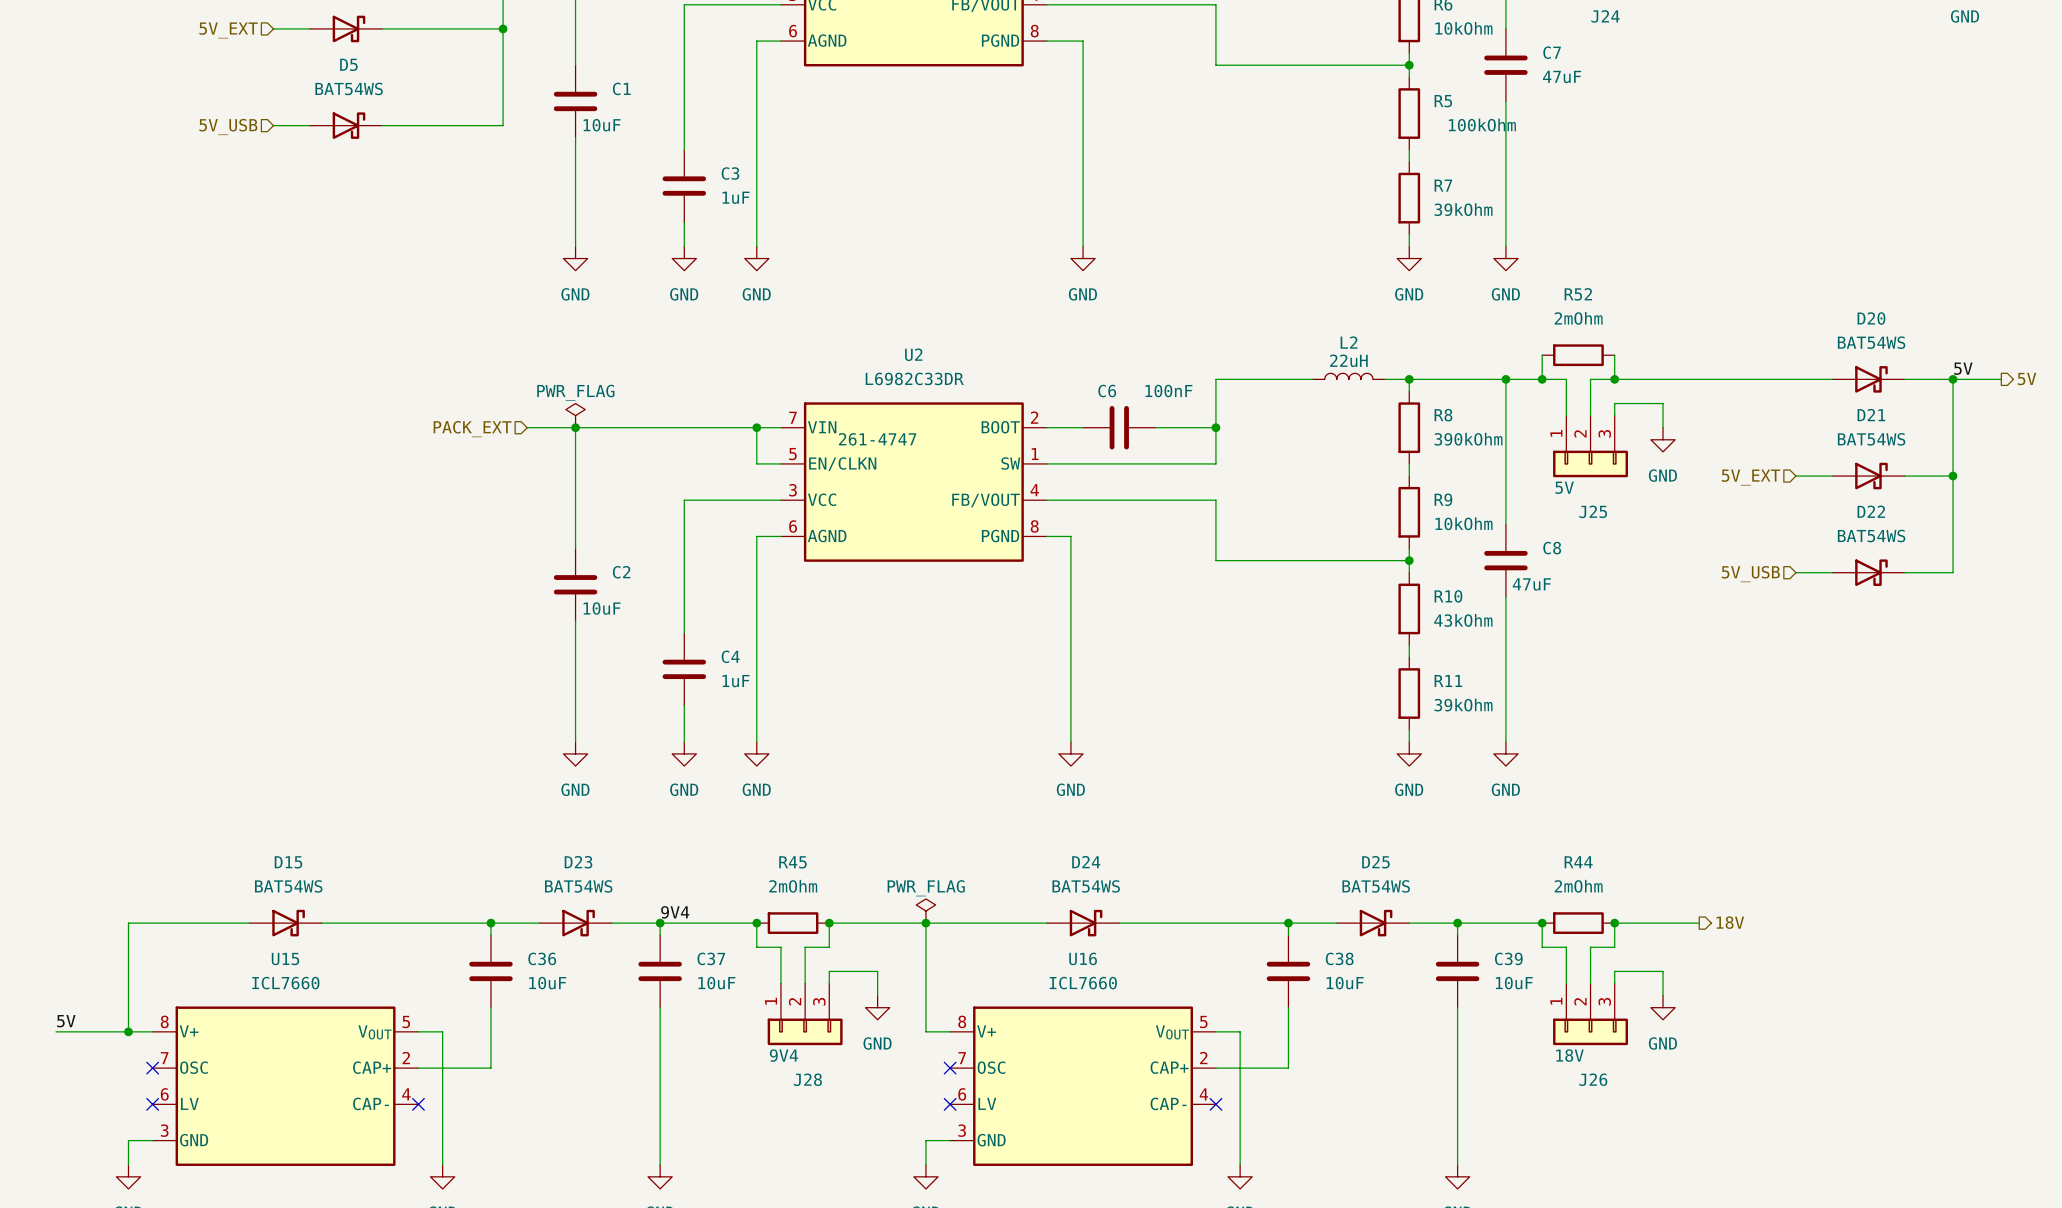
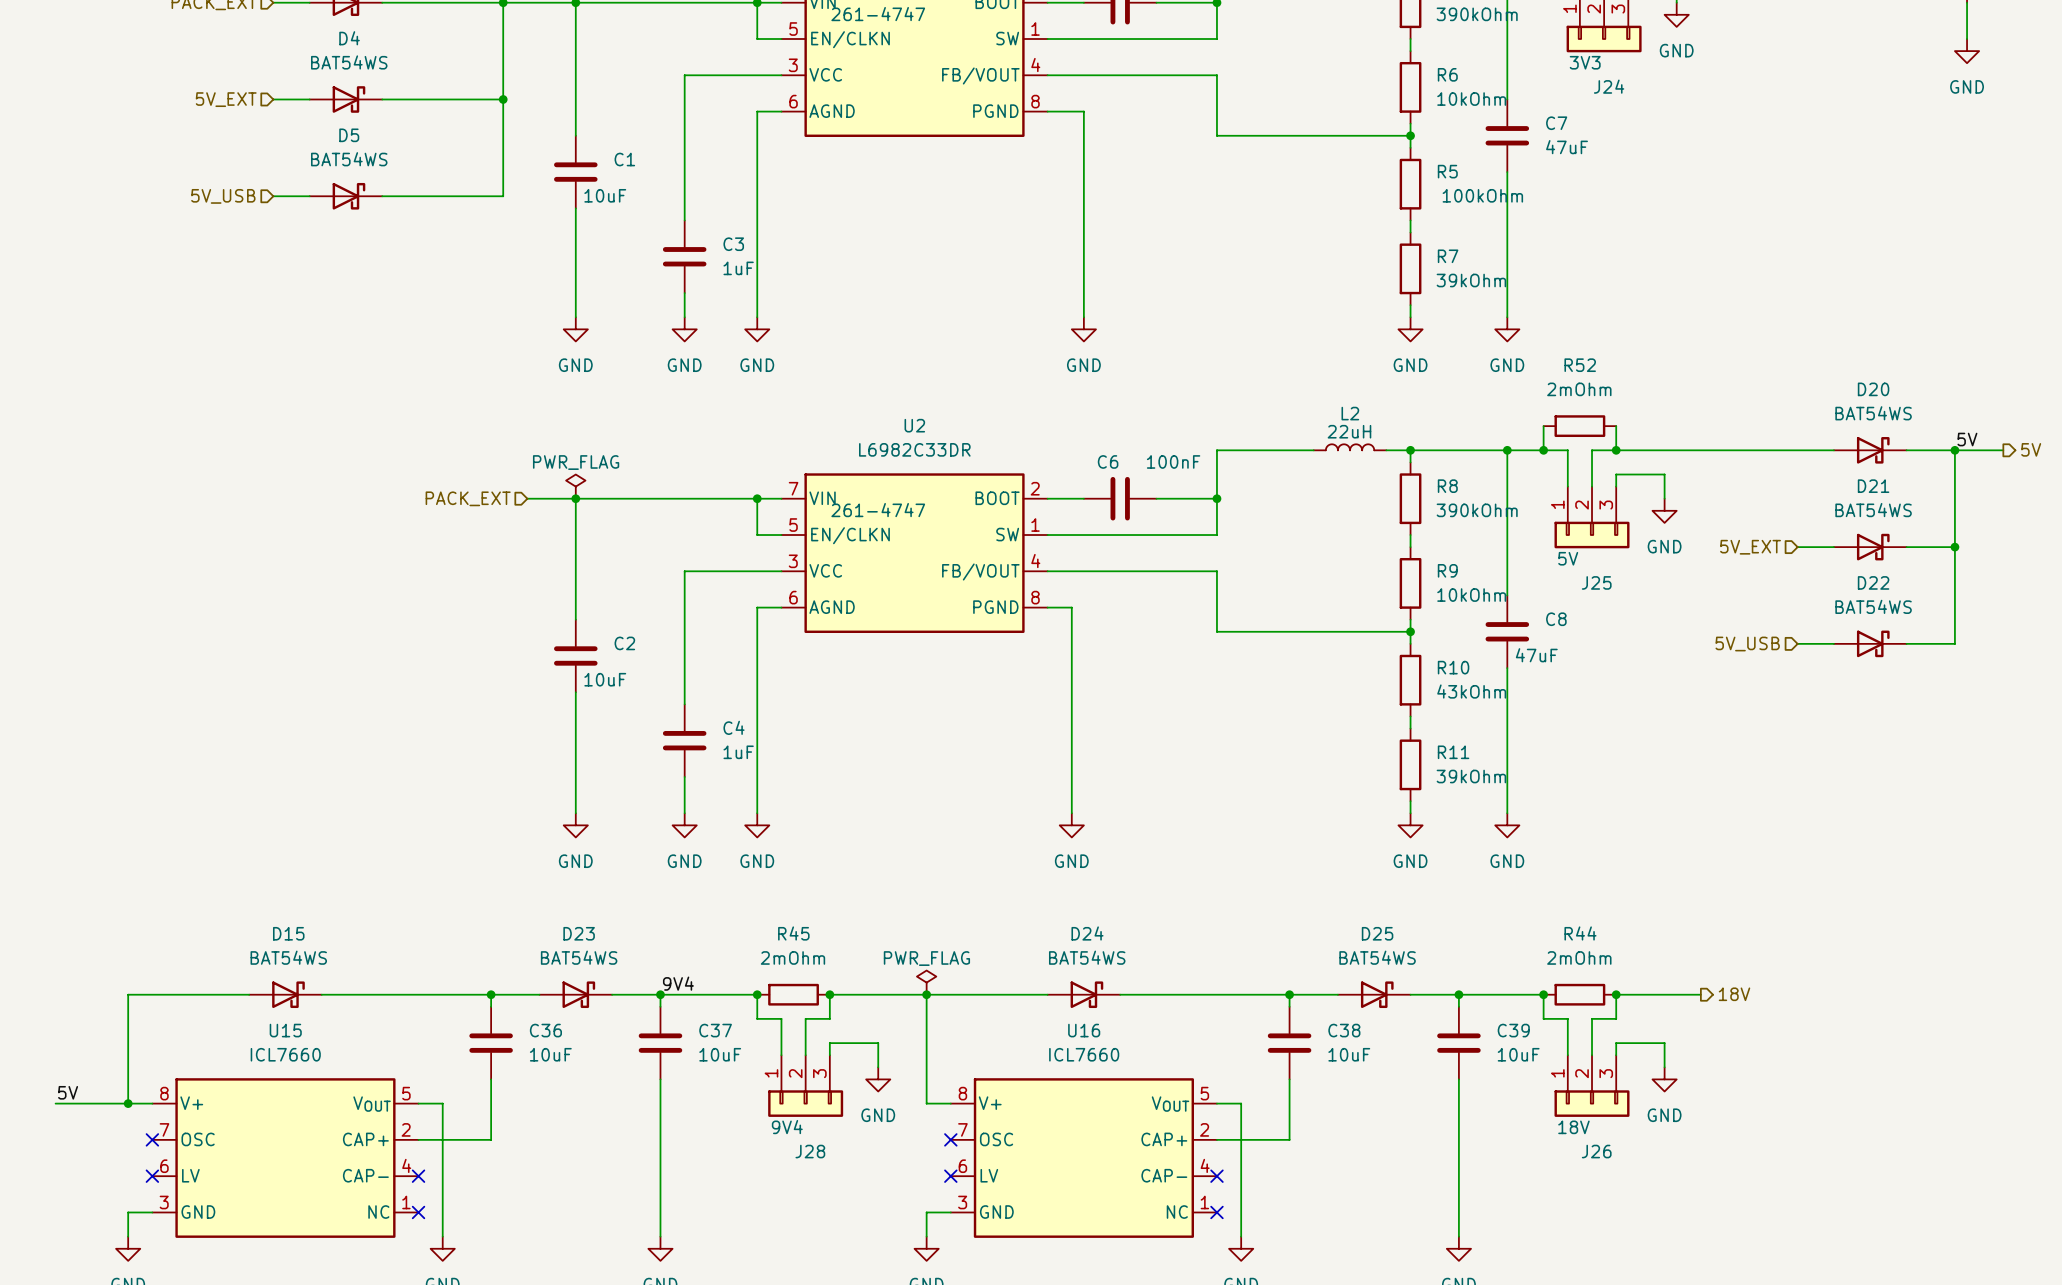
U15 symbol: [152, 1006, 419, 1166] -> [152, 1078, 419, 1238]
U16 symbol: [950, 1006, 1216, 1166] -> [950, 1078, 1217, 1238]
no-connect mark: none -> (418, 1212)
no-connect mark: none -> (1216, 1212)

